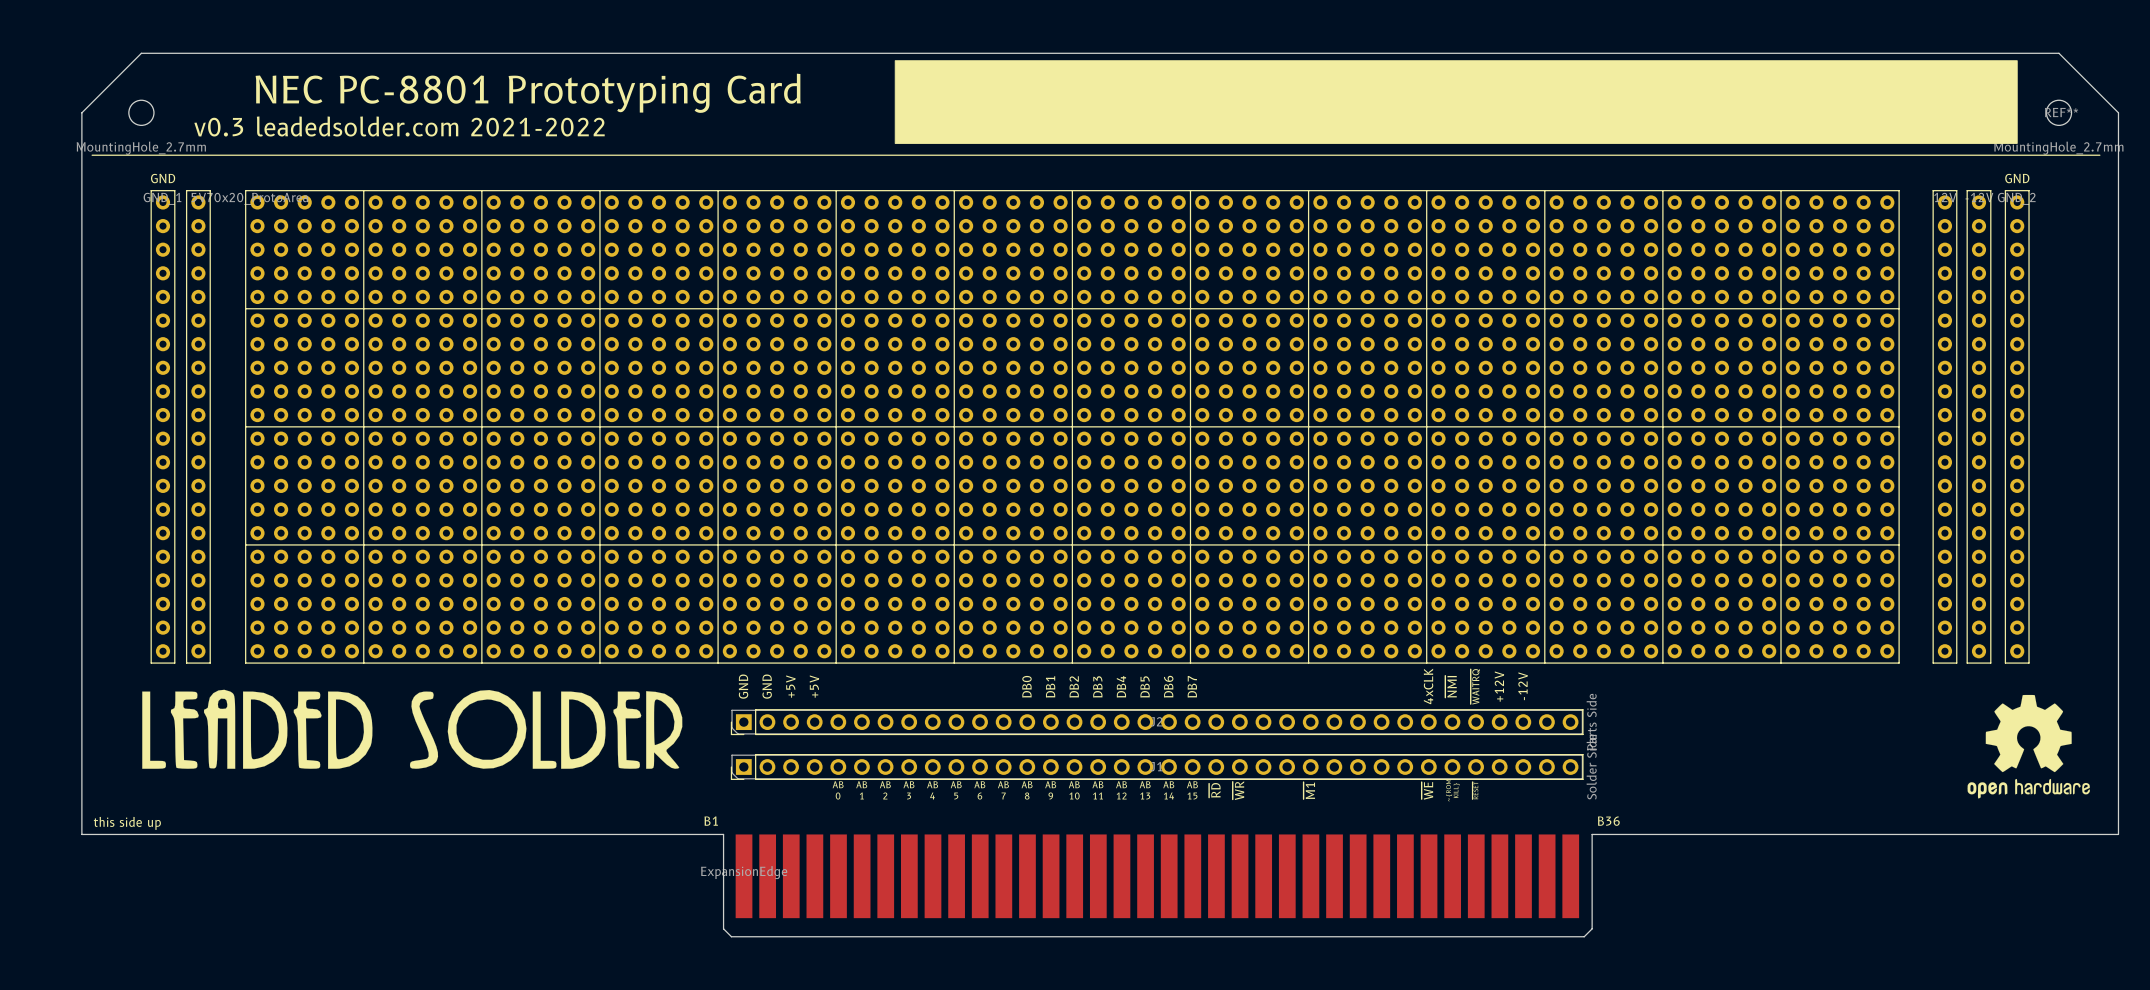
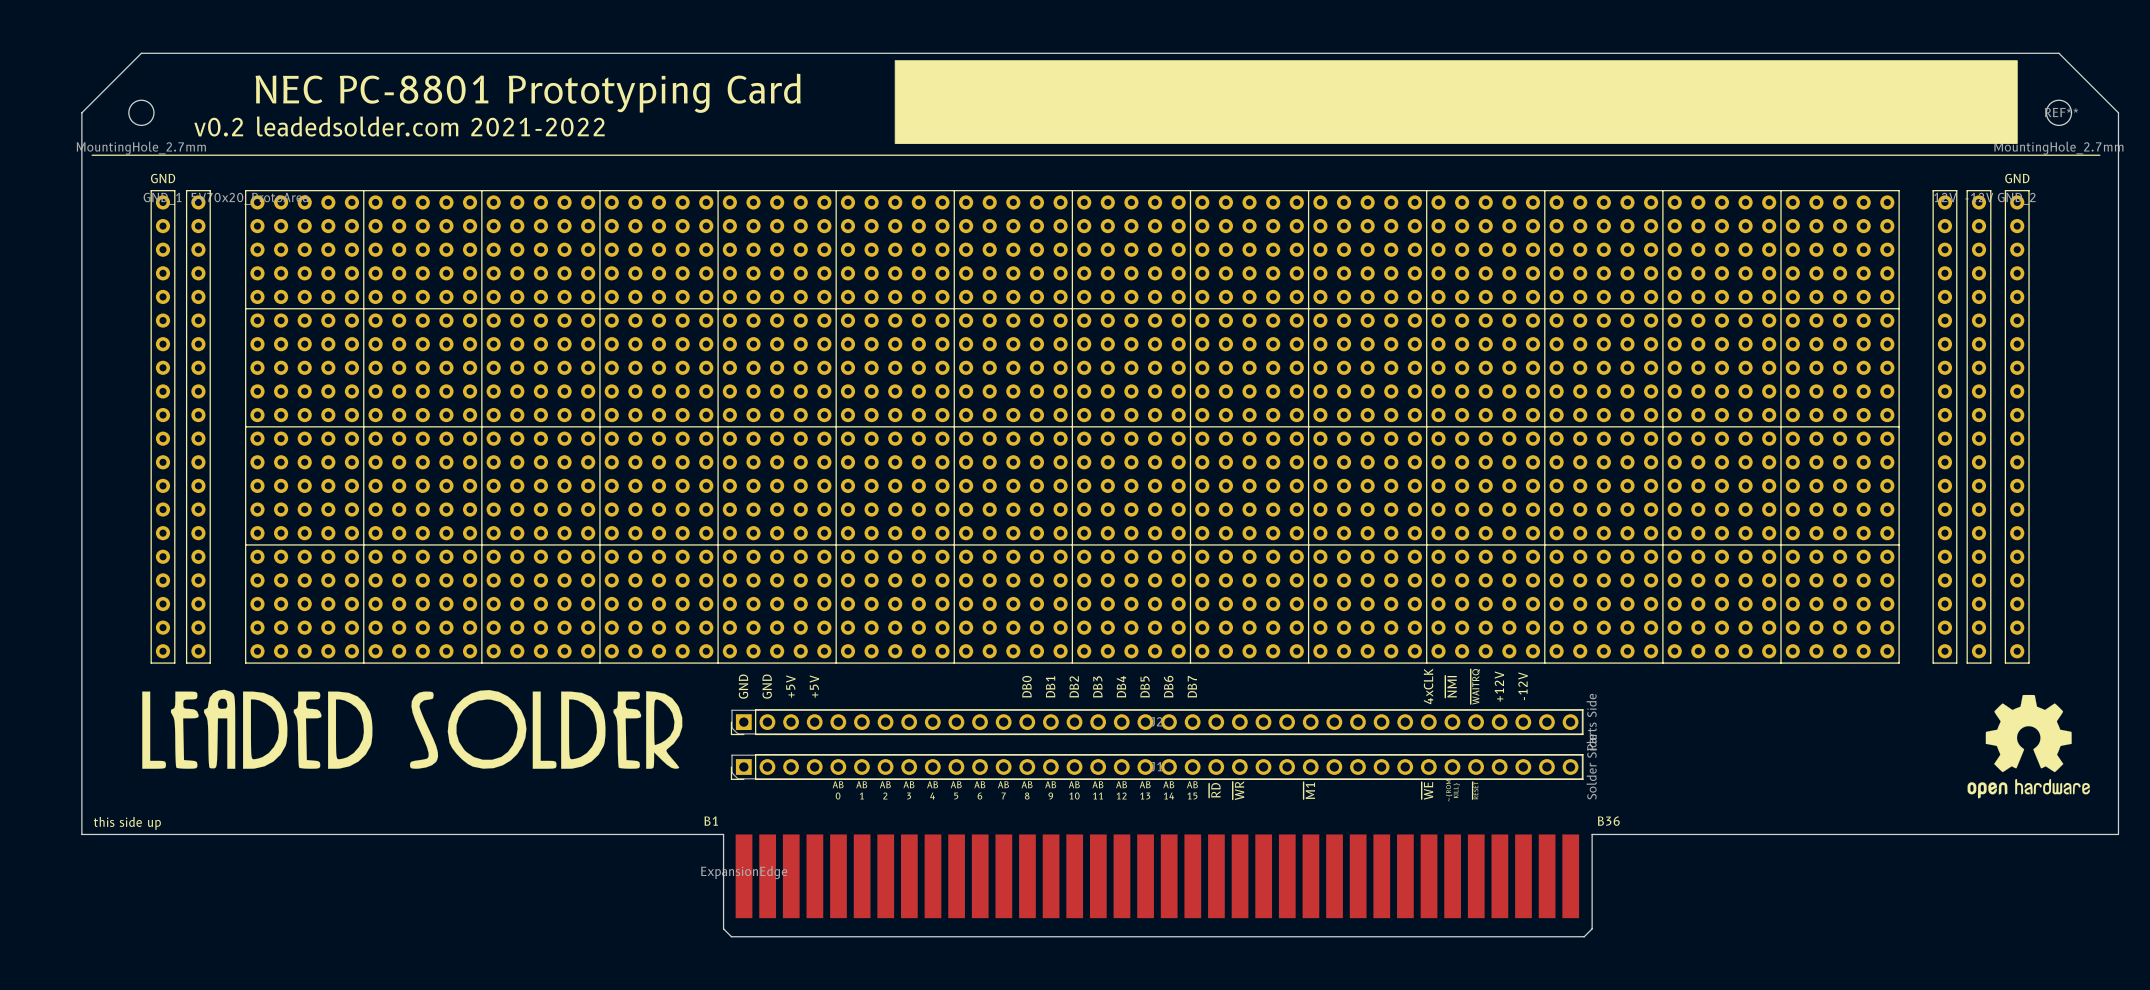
text: v0.3 leadedsolder.com 2021-2022 (399, 126) -> v0.2 leadedsolder.com 2021-2022 (399, 126)

